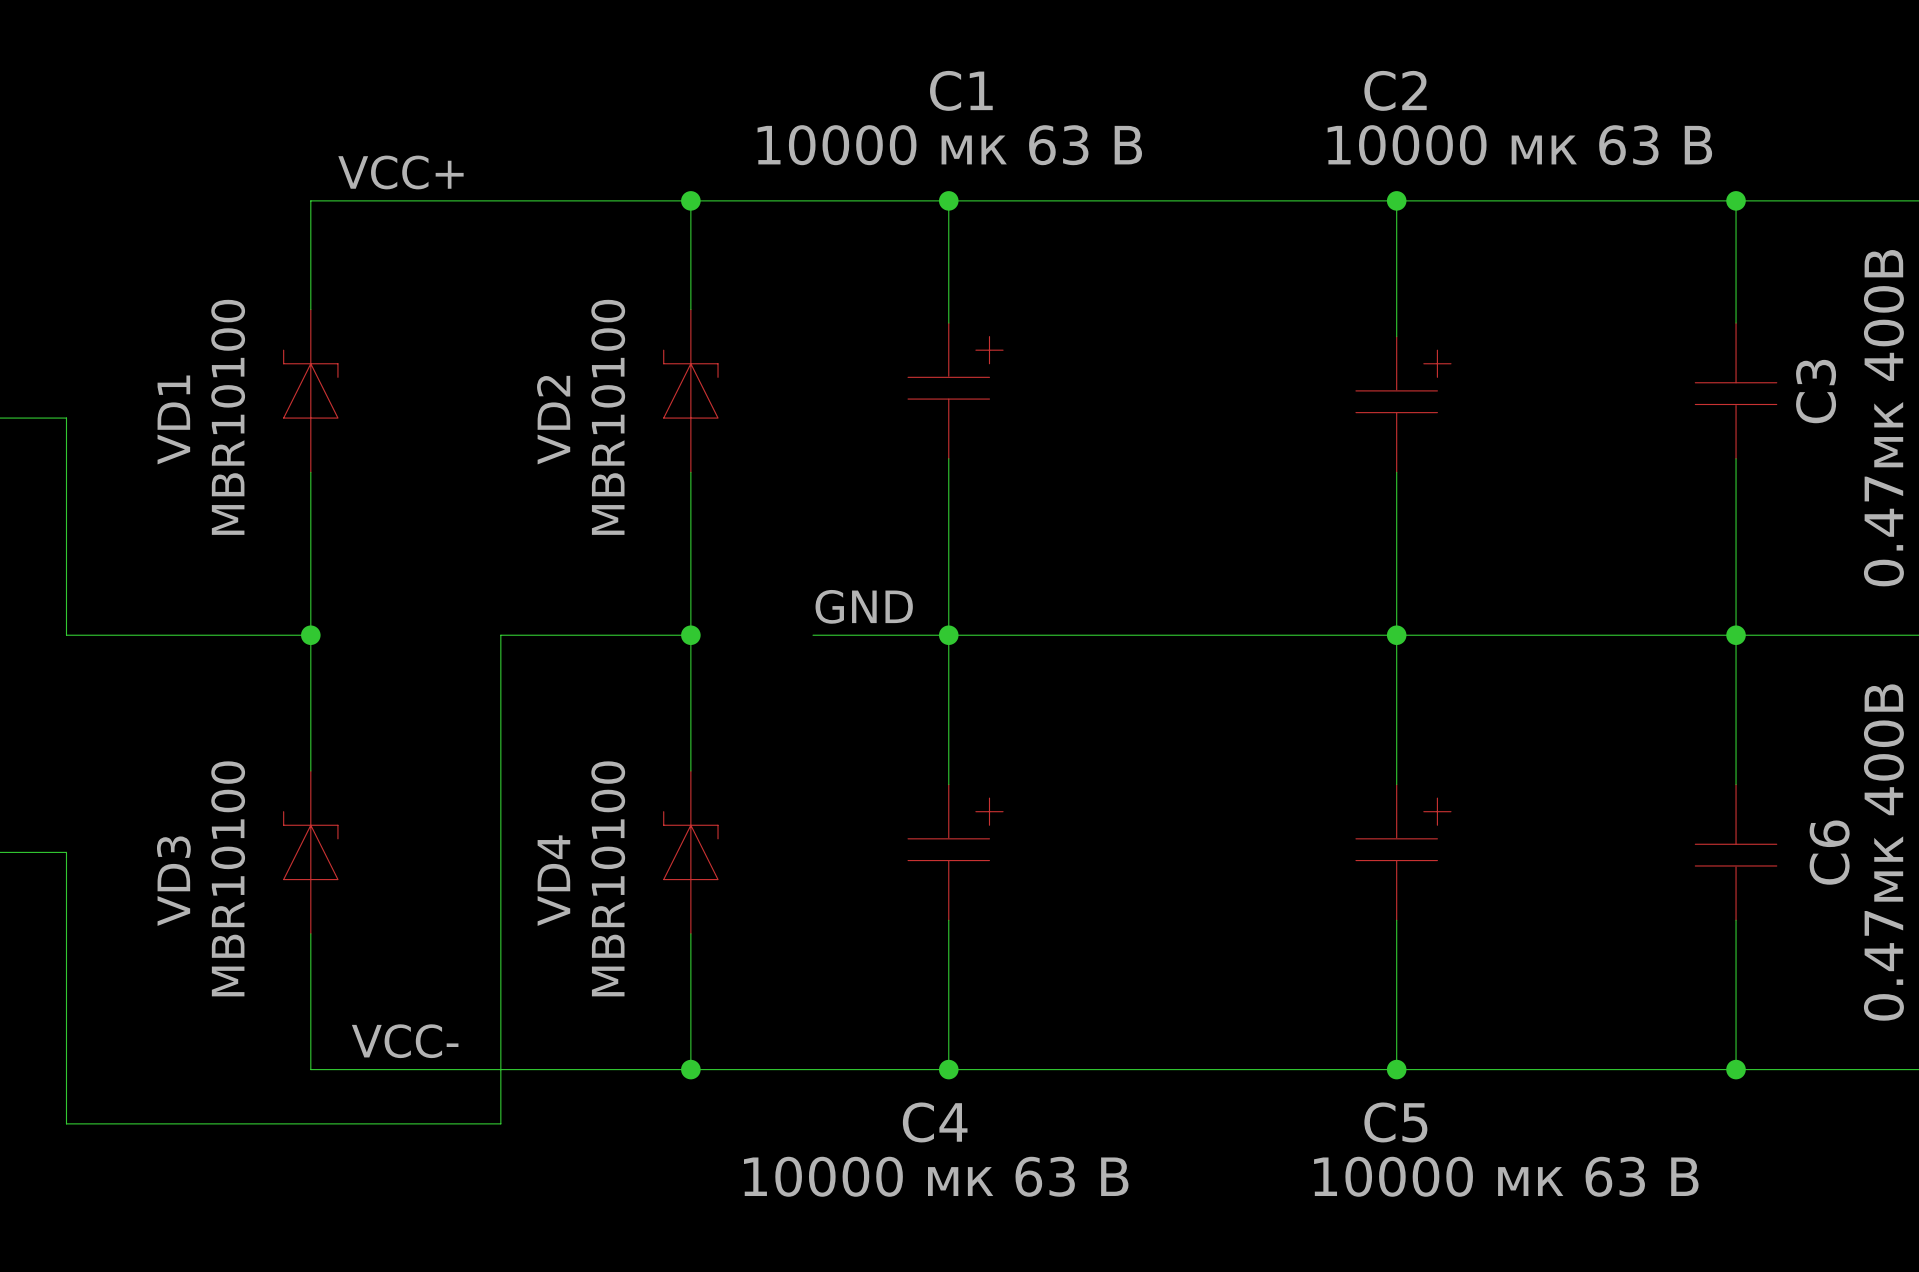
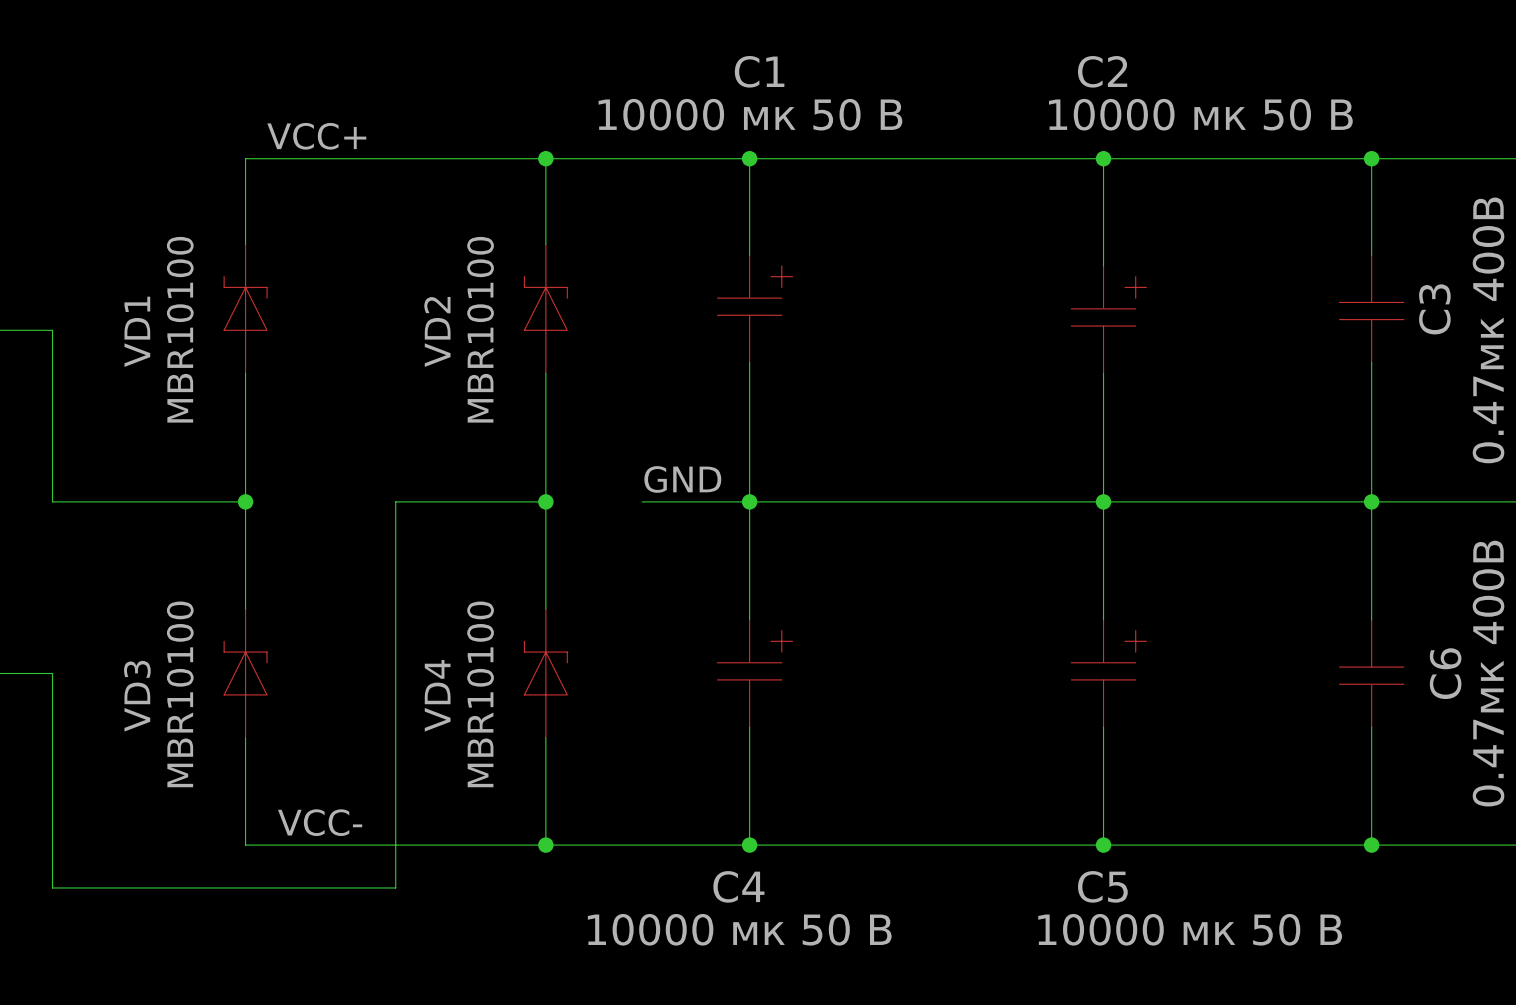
C1 value: 10000 мк 63 В (949, 145) -> 10000 мк 50 В (750, 114)
C2 value: 10000 мк 63 В (1519, 145) -> 10000 мк 50 В (1200, 114)
C4 value: 10000 мк 63 В (936, 1176) -> 10000 мк 50 В (739, 929)
C5 value: 10000 мк 63 В (1506, 1176) -> 10000 мк 50 В (1190, 929)

